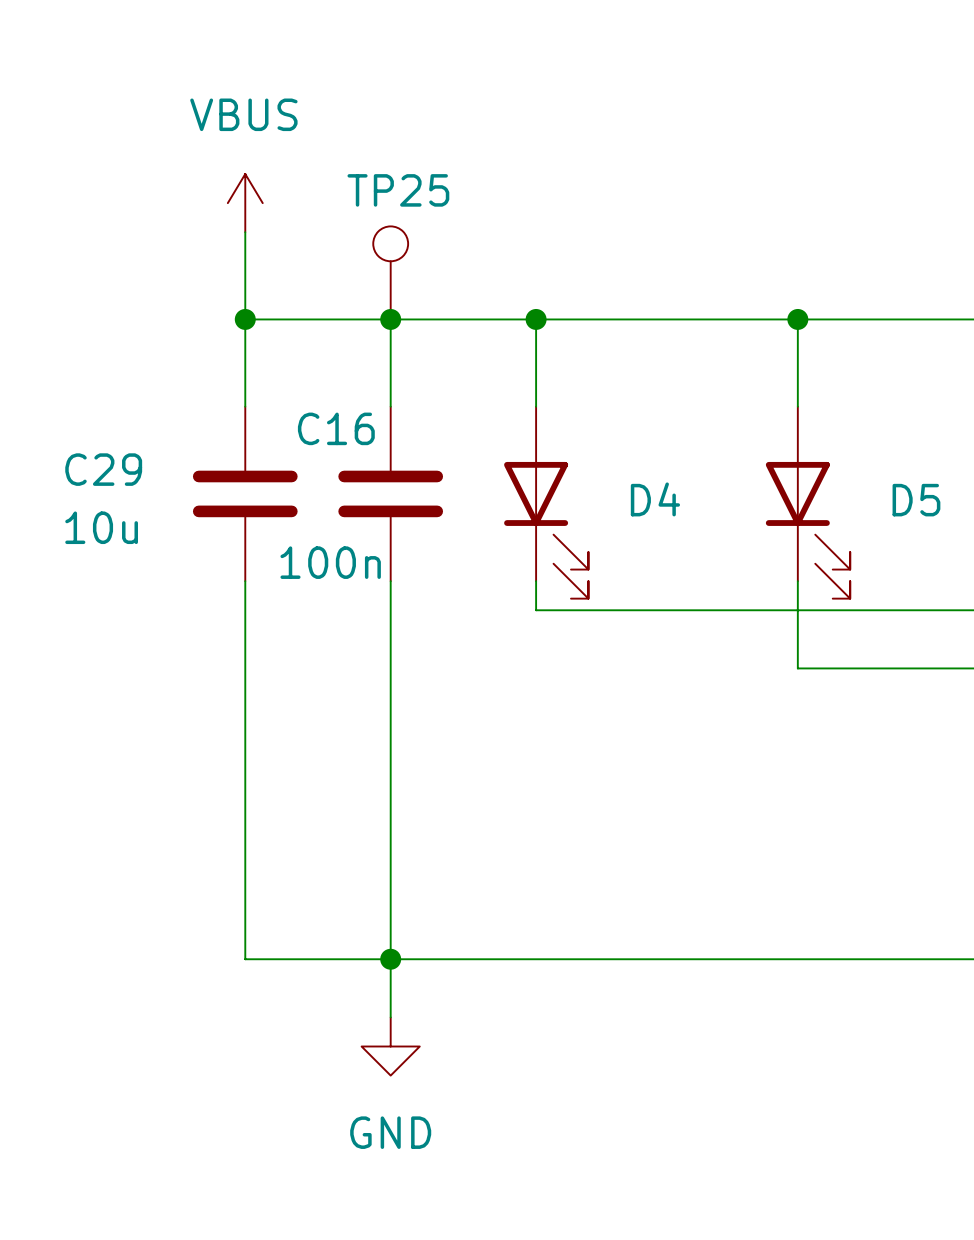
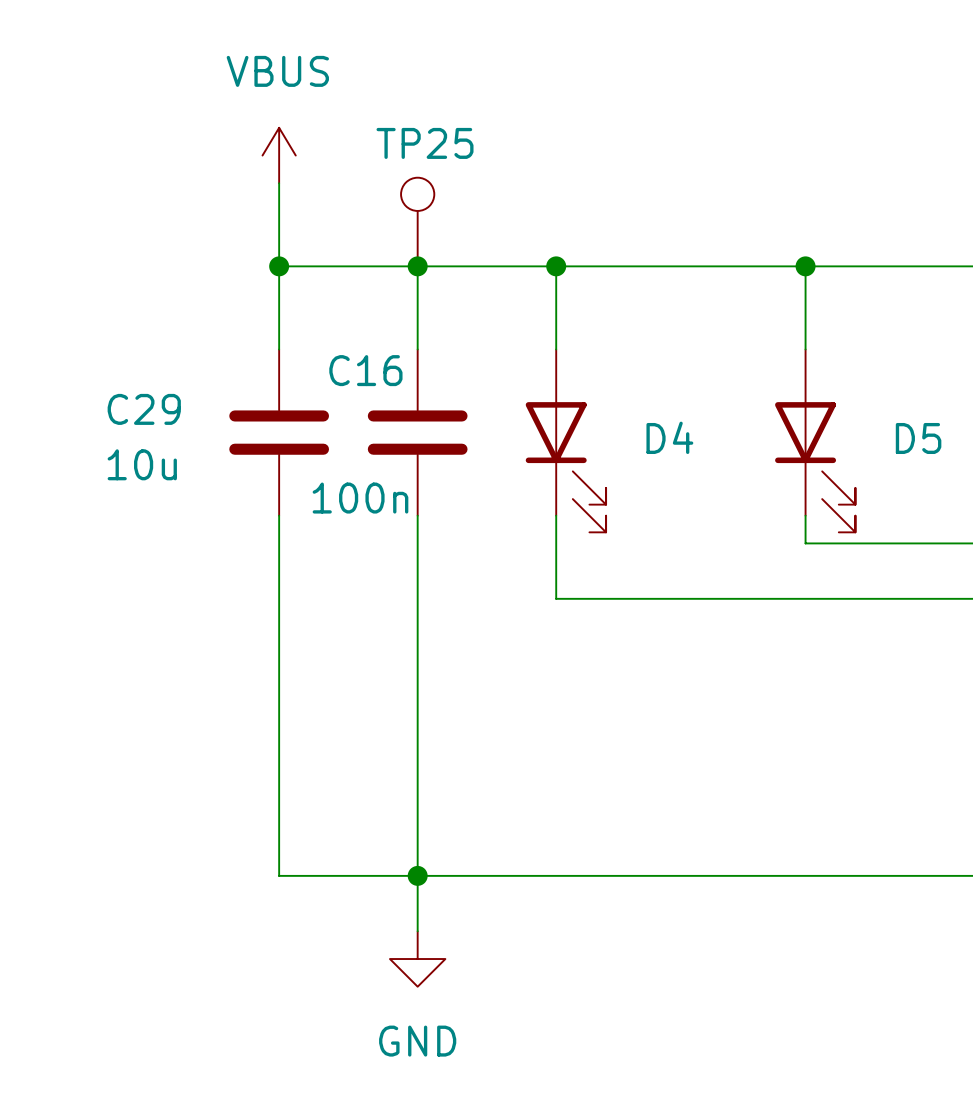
wire: (536, 610) (797, 610) (797, 668) -> (556, 543) (556, 598) (805, 598)

